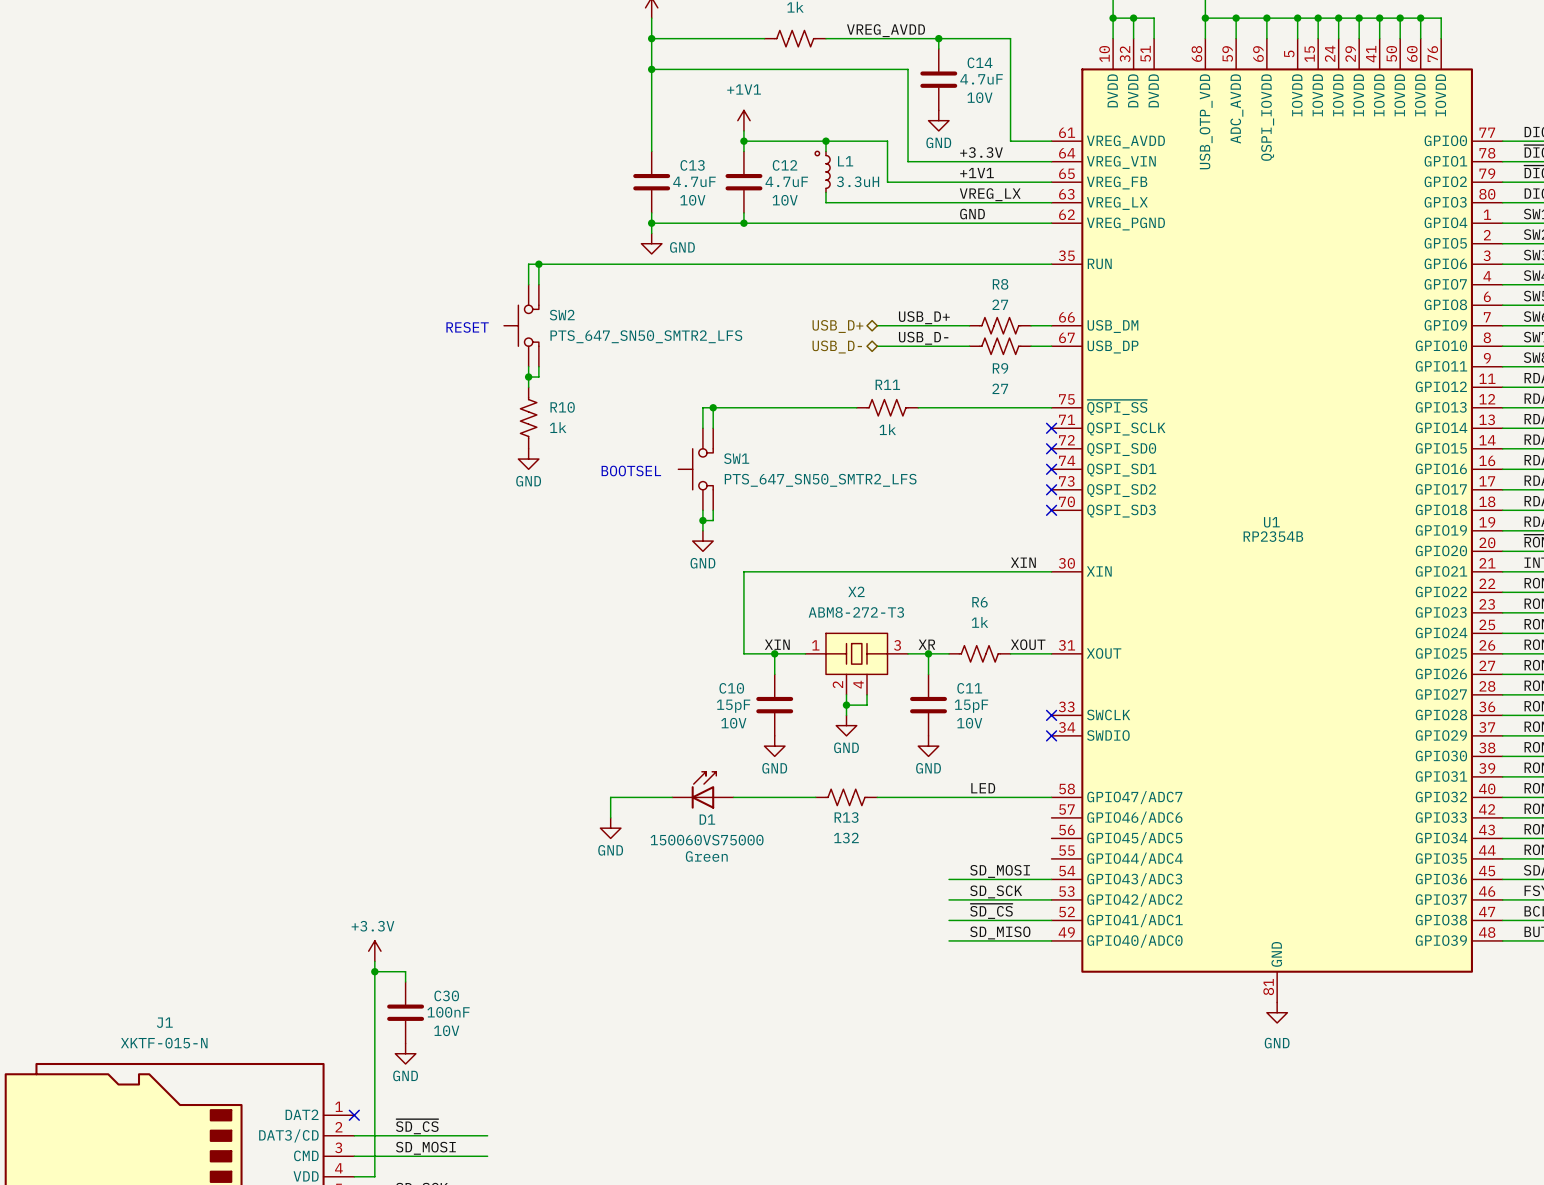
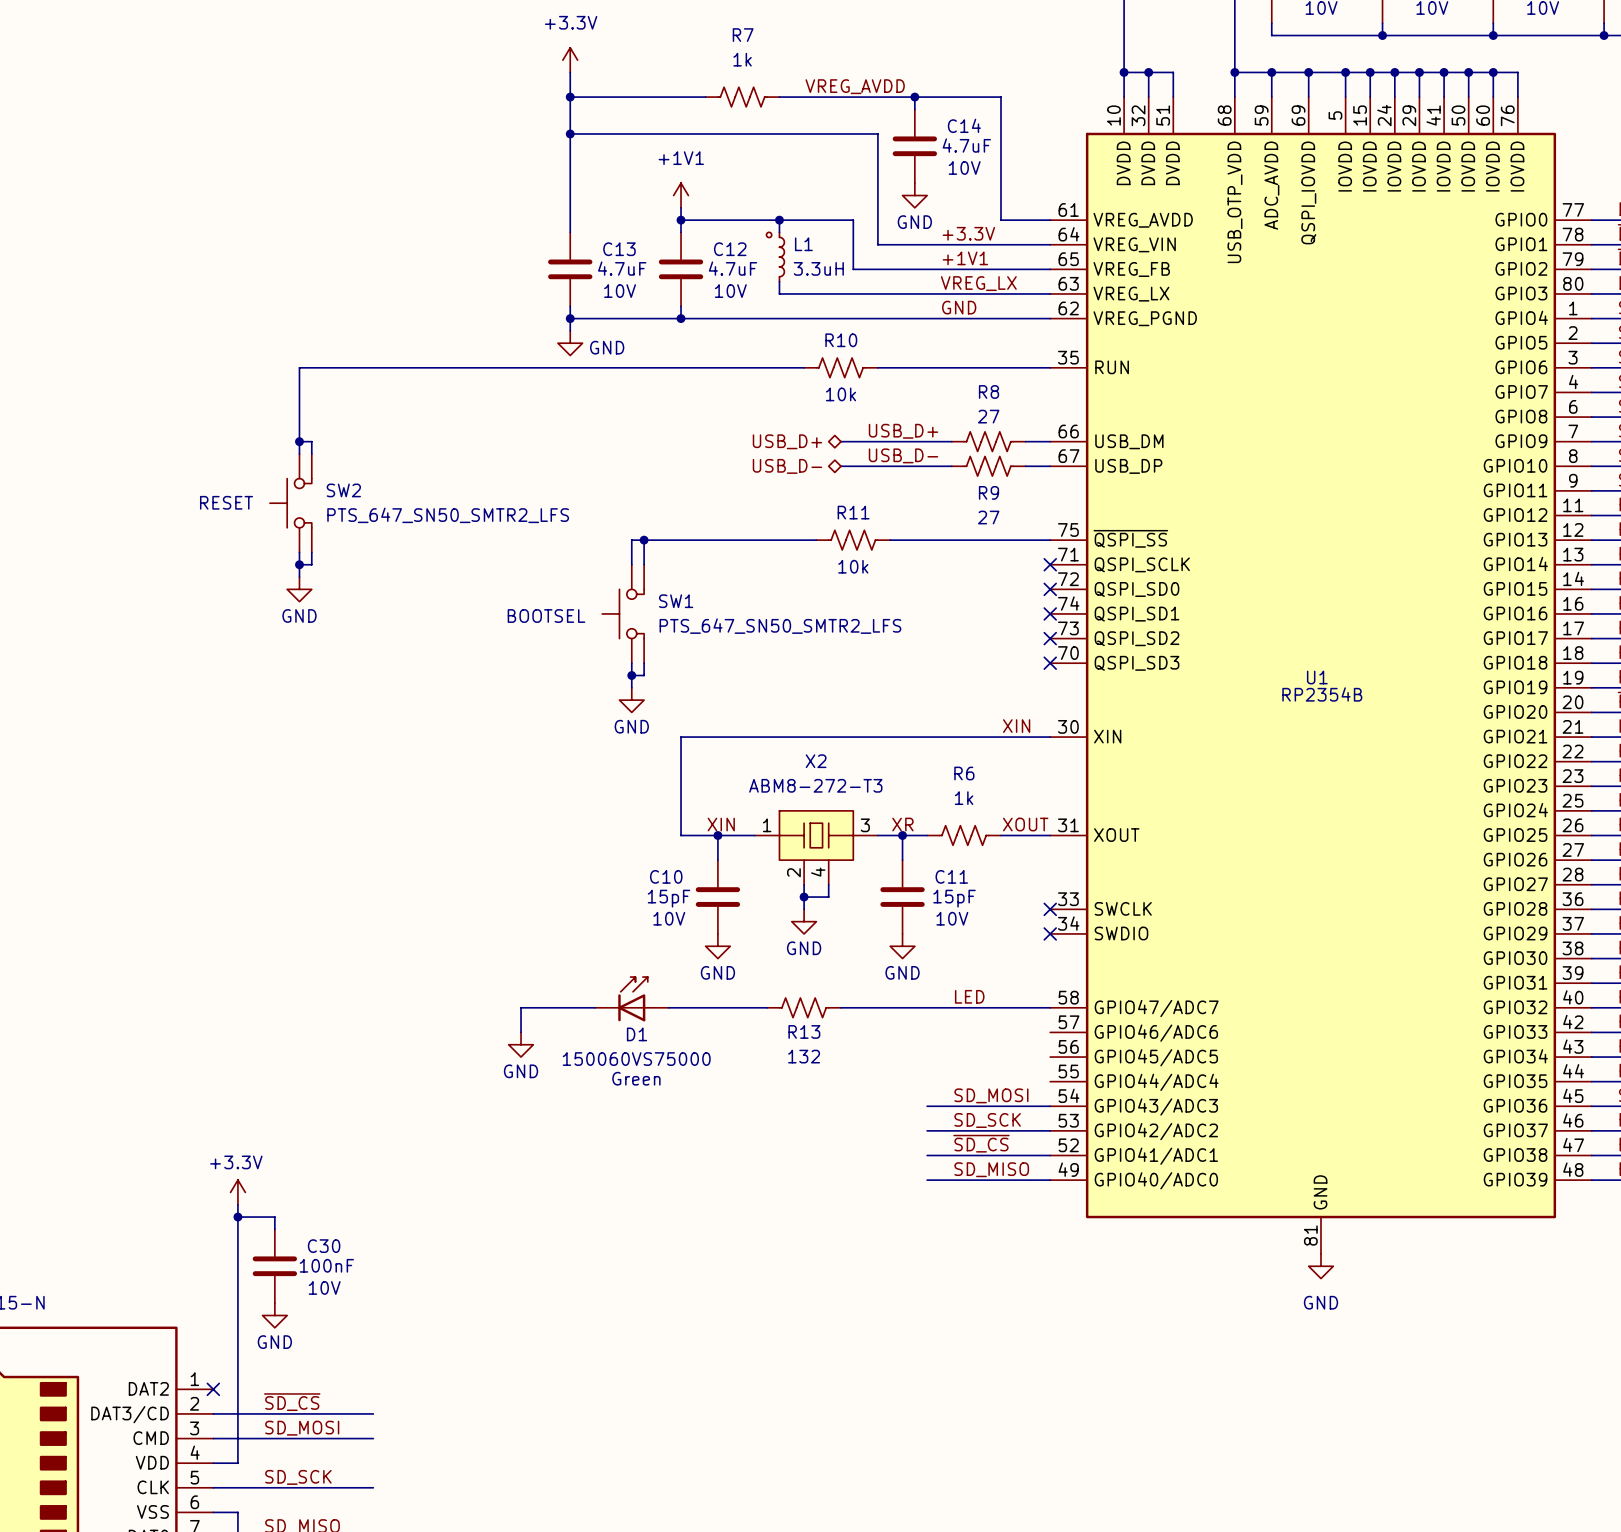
wire: (528, 264) (528, 284) -> (422, 367) (299, 367) (299, 453)
wire: (538, 264) (538, 284) -> none
junction: (538, 264) -> none
wire: none -> (299, 441) (311, 441) (311, 453)
junction: none -> (299, 441)
SW2 position: (521, 325) -> (290, 503)
text position: RESET (467, 327) -> RESET (226, 502)
wire: (528, 366) (528, 387) -> (299, 552) (299, 577)
wire: (538, 366) (538, 377) (528, 377) -> (311, 552) (311, 564) (299, 564)
junction: (528, 377) -> none
R10 name position: R10 (562, 407) -> R10 (841, 340)
R10 rotation: 0° (528, 418) -> 90° clockwise (841, 367)
R10 position: (528, 418) -> (841, 367)
R10 value: 1k (558, 427) -> 10k (841, 394)
junction: none -> (299, 564)
R11 value: 1k (887, 429) -> 10k (853, 566)
power symbol position: GND (528, 459) -> GND (299, 589)

